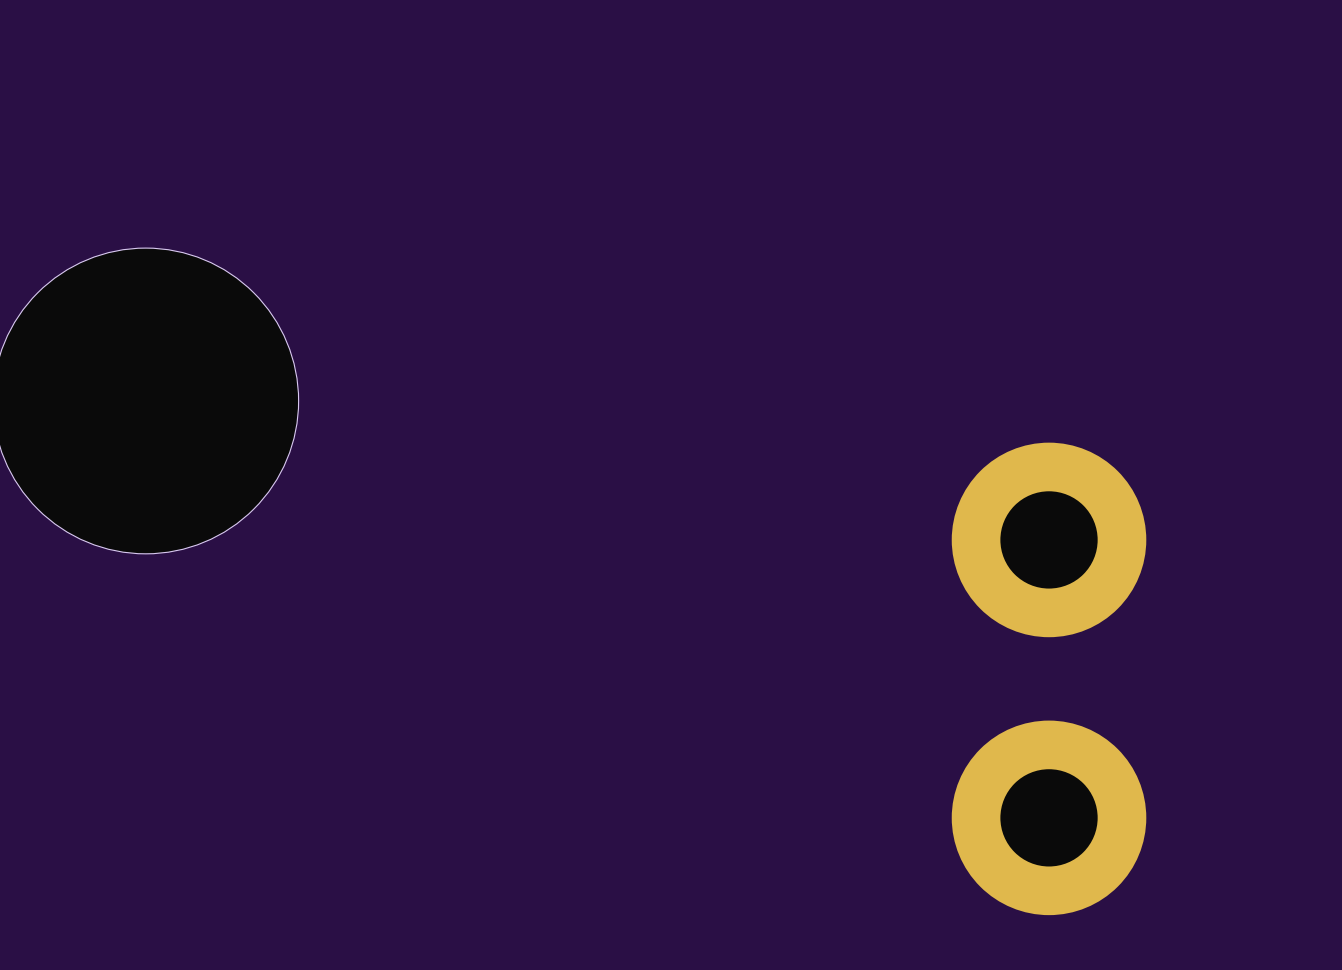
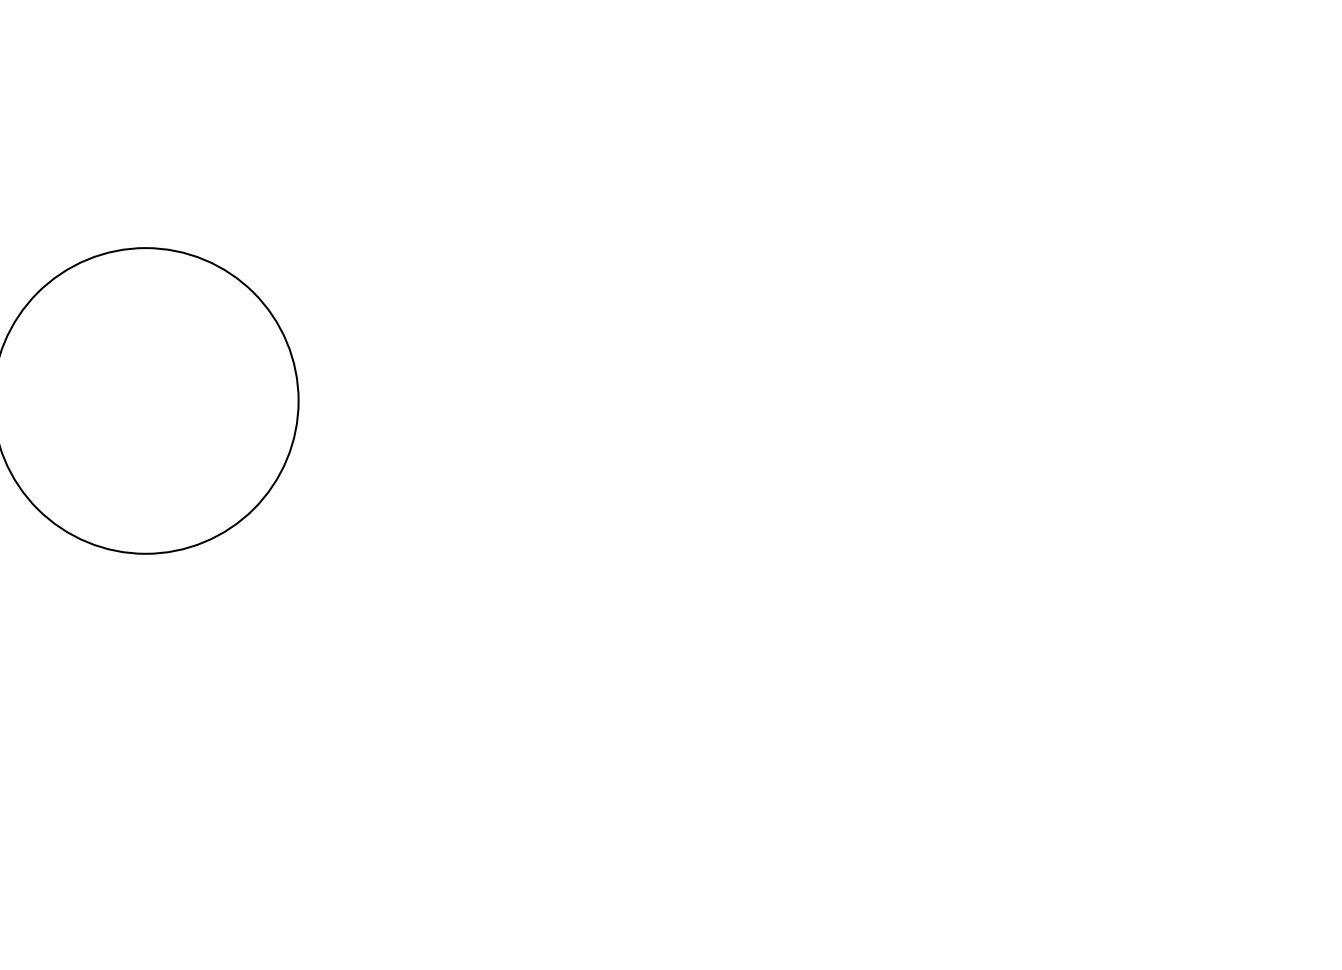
part: (1049, 678) -> none

